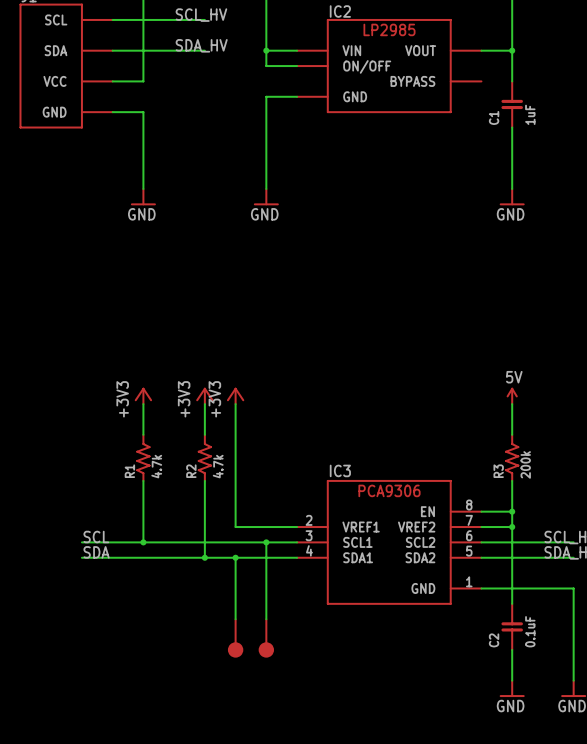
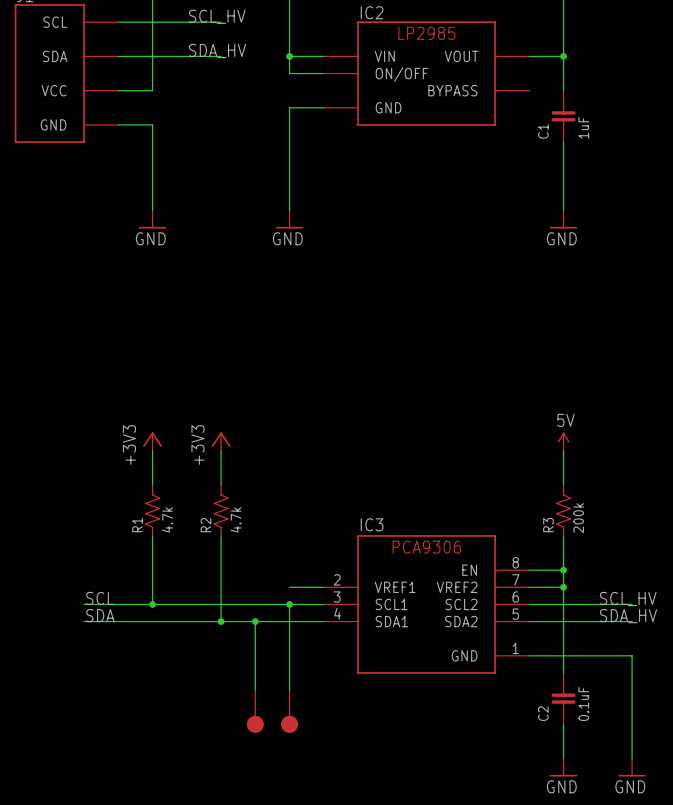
power symbol: +3V3 (235, 396) -> none
wire: (235, 404) (235, 527) (266, 527) -> none

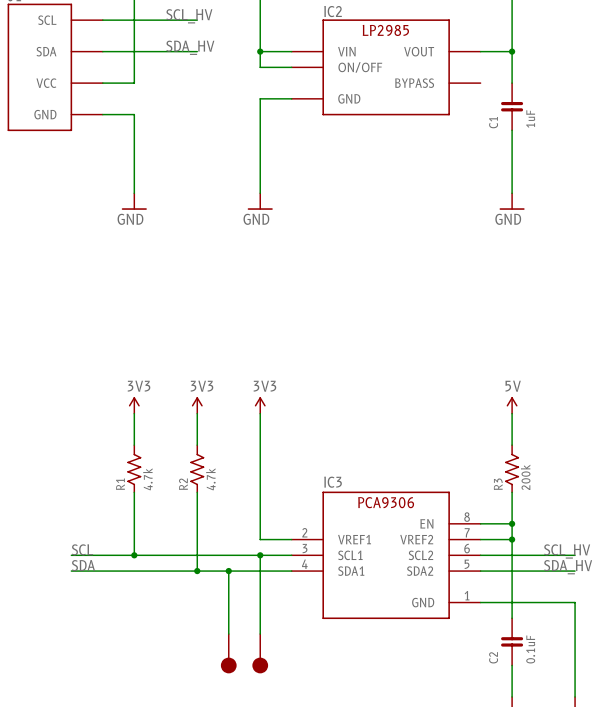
power symbol: +3V3 (152, 441) -> 3V3 (134, 405)
power symbol: +3V3 (221, 441) -> 3V3 (197, 405)
power symbol: none -> 3V3 (260, 405)
wire: none -> (260, 413) (260, 539)

